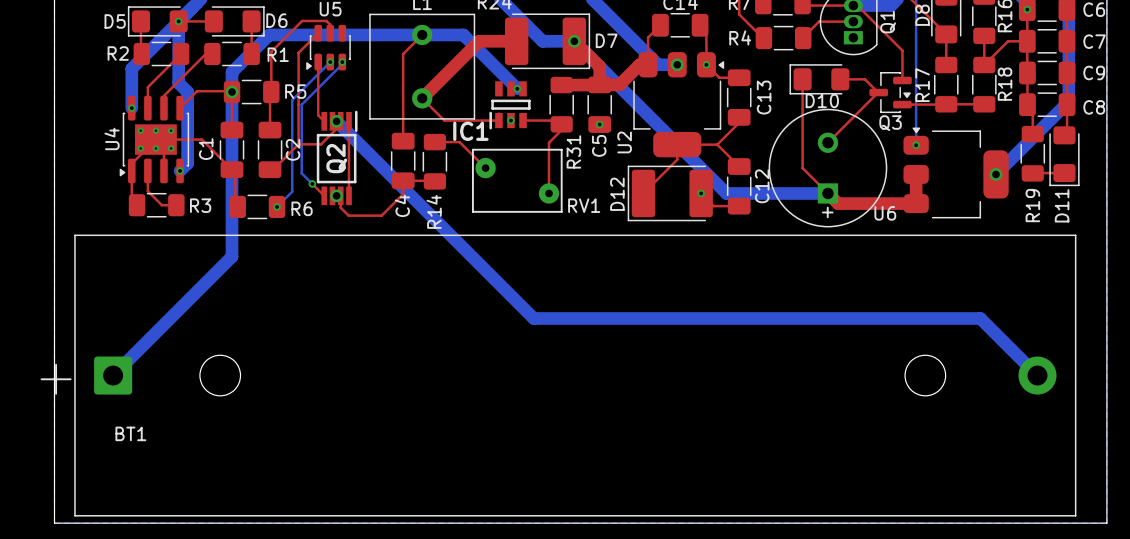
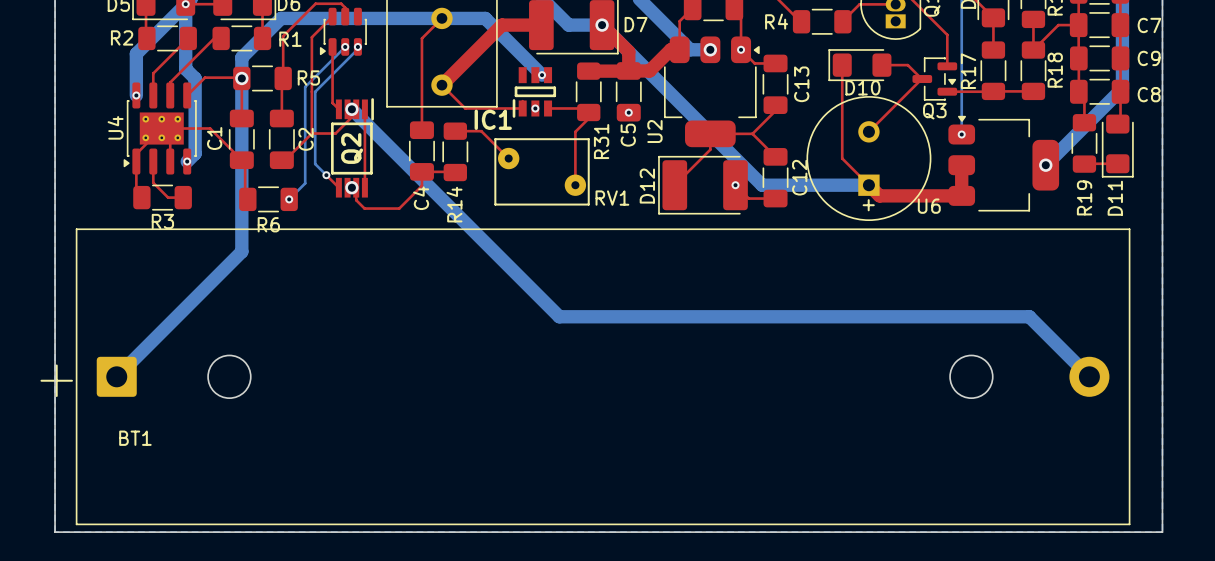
R3 name position: R3 (200, 205) -> R3 (162, 221)
R6 name position: R6 (302, 208) -> R6 (268, 224)

